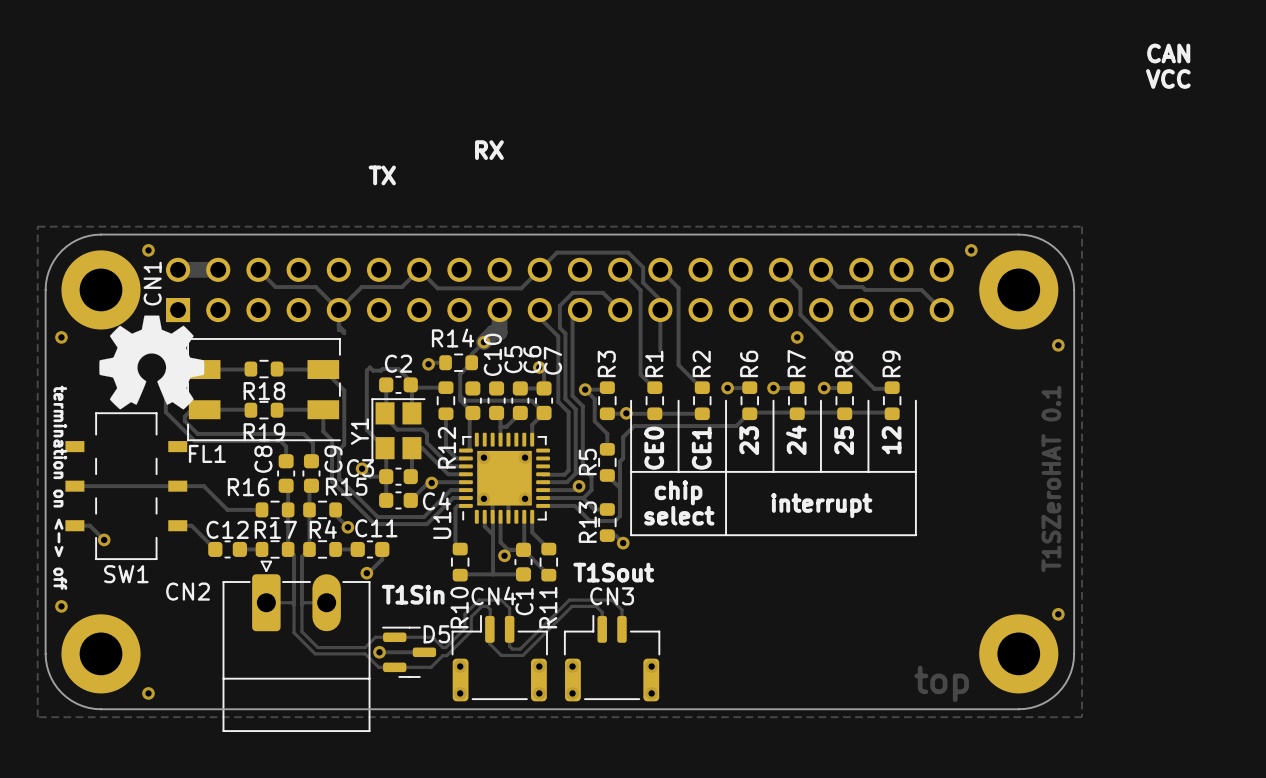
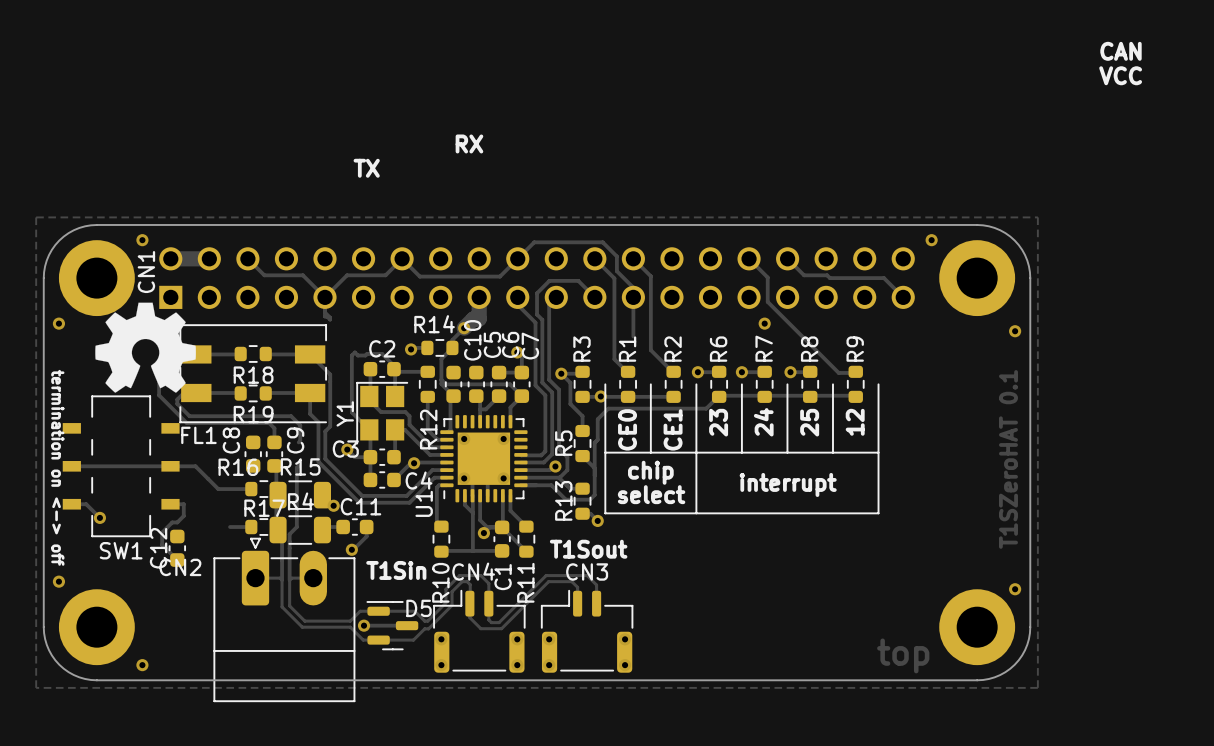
C8 name: C8 (263, 459) -> C9 (295, 440)
C8: none -> (253, 454)
C9: (311, 473) -> none
R15 footprint: [303, 500, 342, 520] -> [269, 480, 332, 510]
track: (191, 525) (215, 549) -> (183, 504) (183, 516) (177, 522) (172, 522) (162, 532) (162, 544) (177, 560)
R4 footprint: [303, 540, 342, 559] -> [269, 515, 332, 545]
C12 rotation: 0° (227, 549) -> 90° clockwise (177, 548)
C12 position: (227, 549) -> (177, 548)

